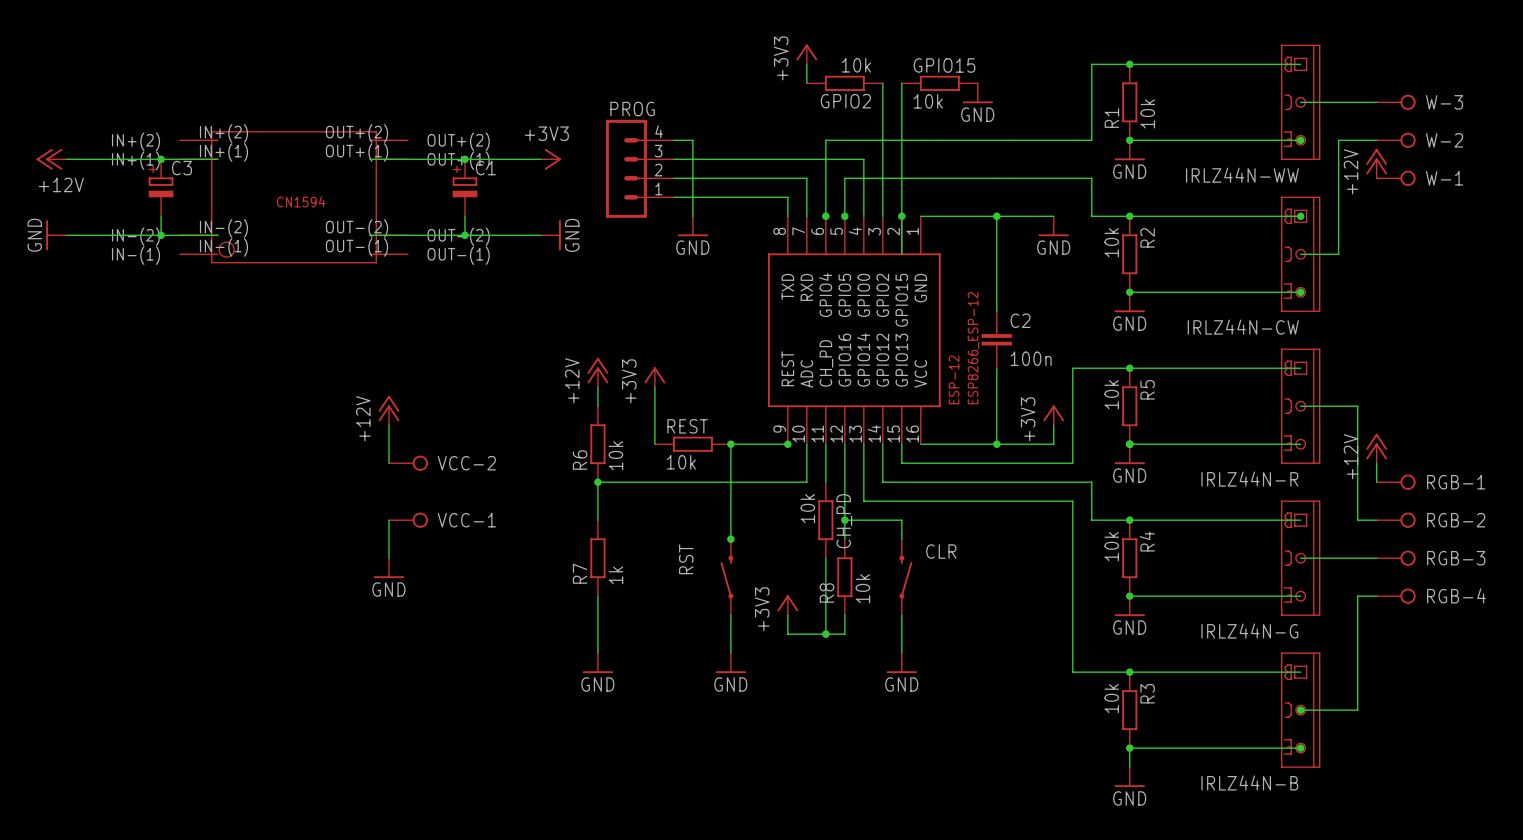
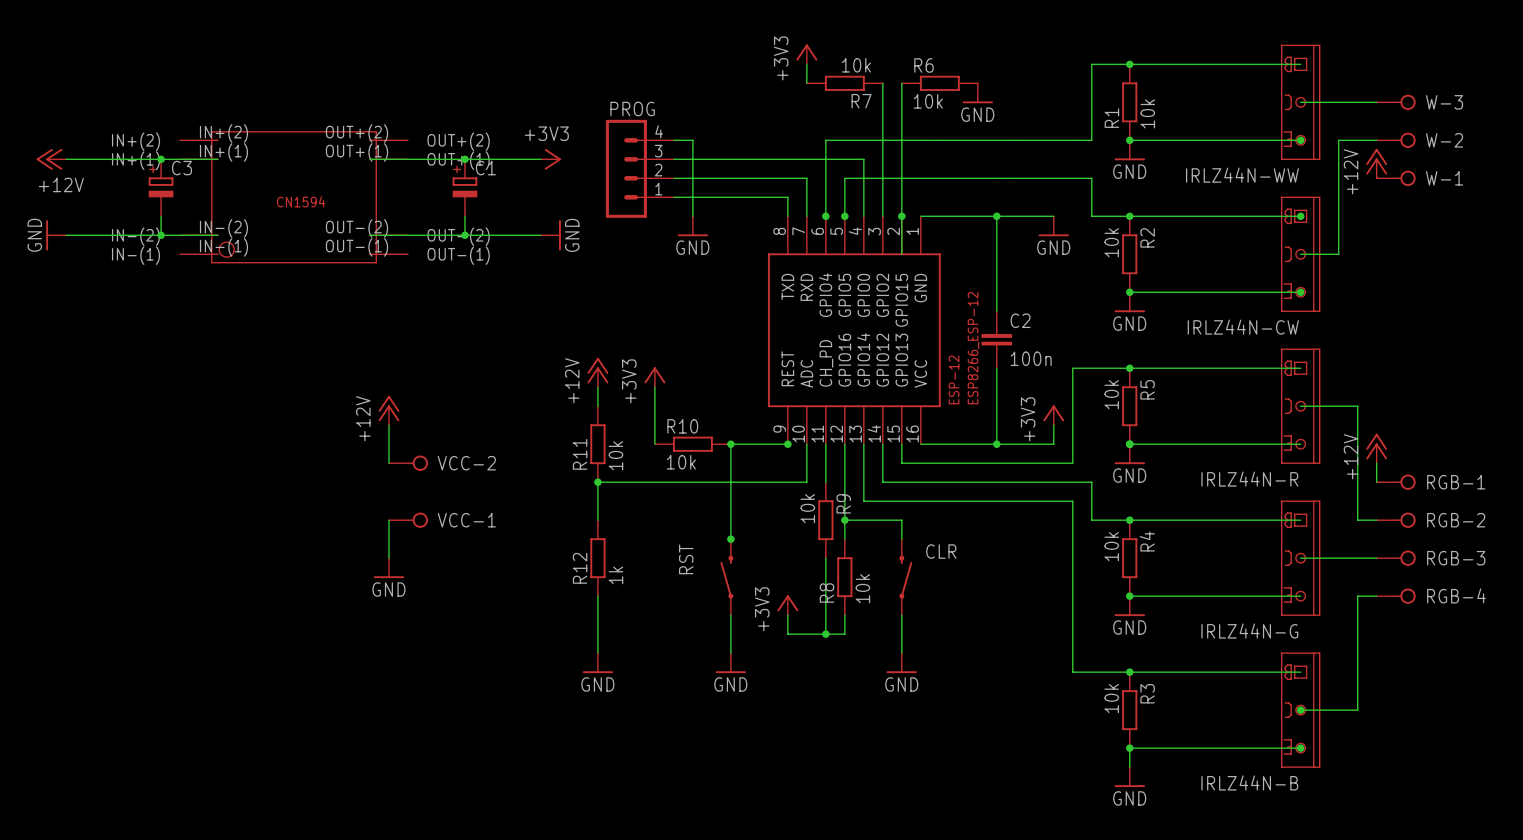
GPIO15 name: GPIO15 (944, 65) -> R6 (923, 65)
GPIO2 name: GPIO2 (845, 101) -> R7 (861, 101)
REST name: REST (687, 426) -> R10 (682, 426)
R6 name: R6 (580, 460) -> R11 (580, 454)
CH_PD name: CH_PD (844, 521) -> R9 (843, 503)
R7 name: R7 (580, 573) -> R12 (580, 568)

